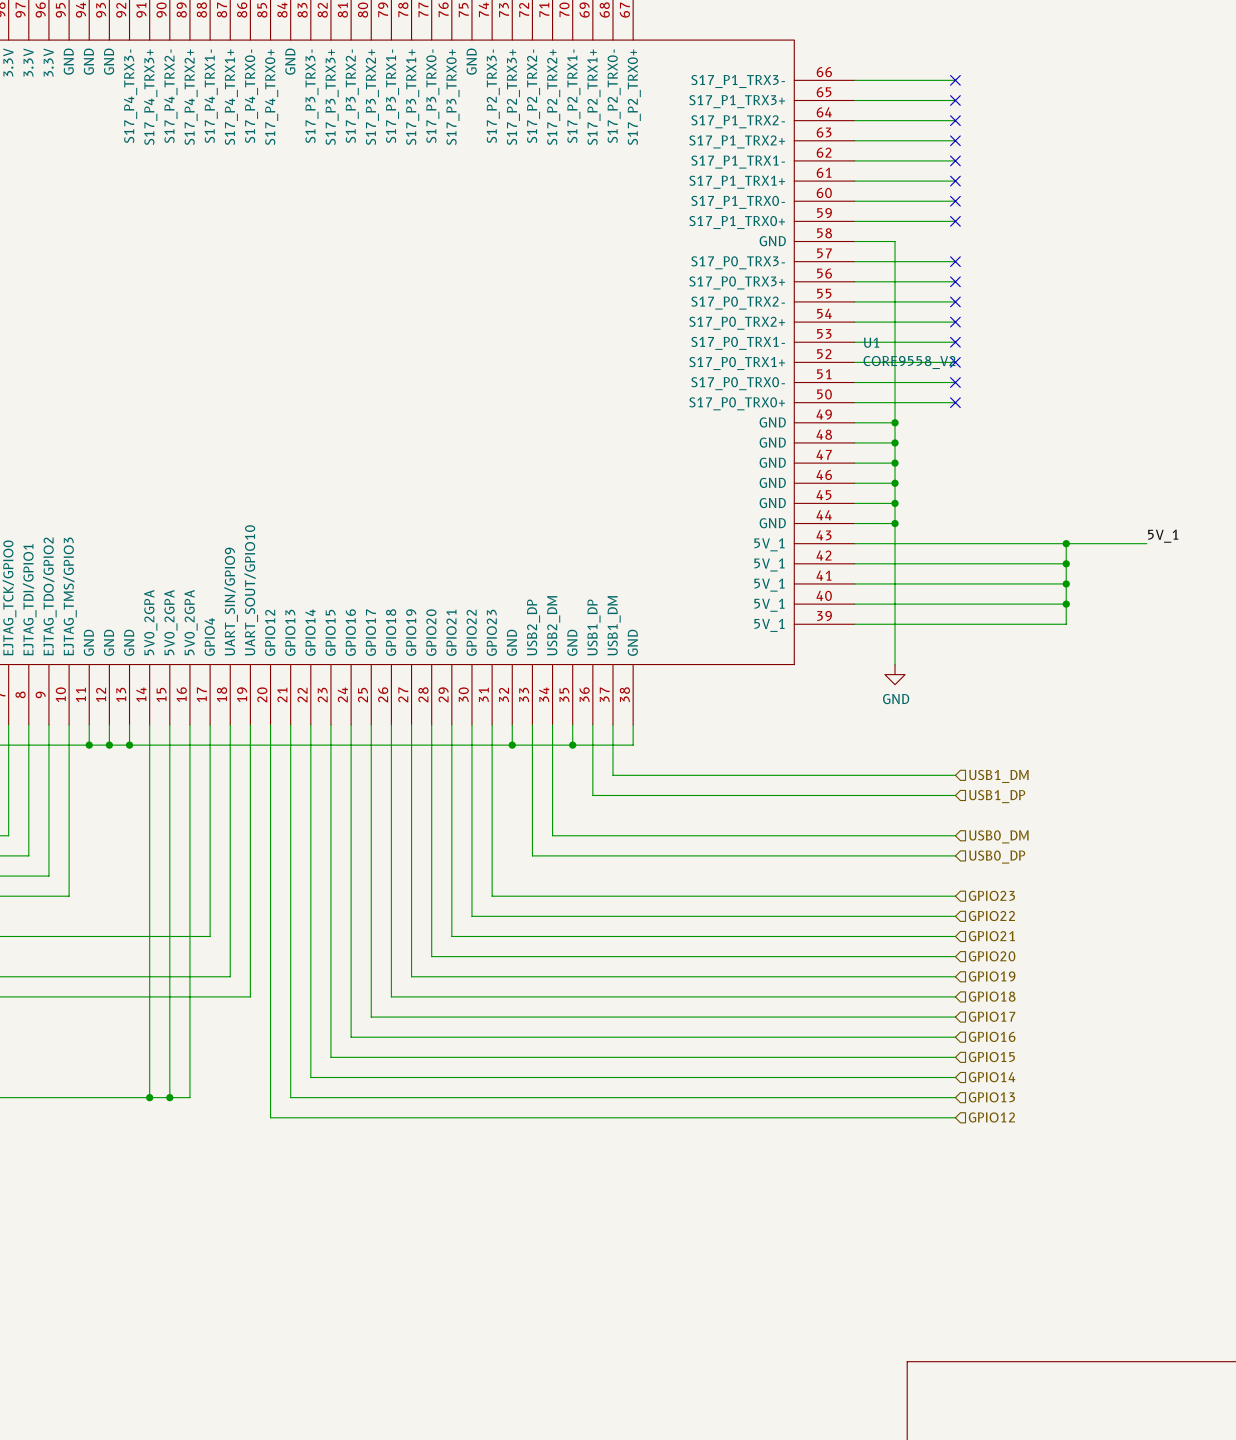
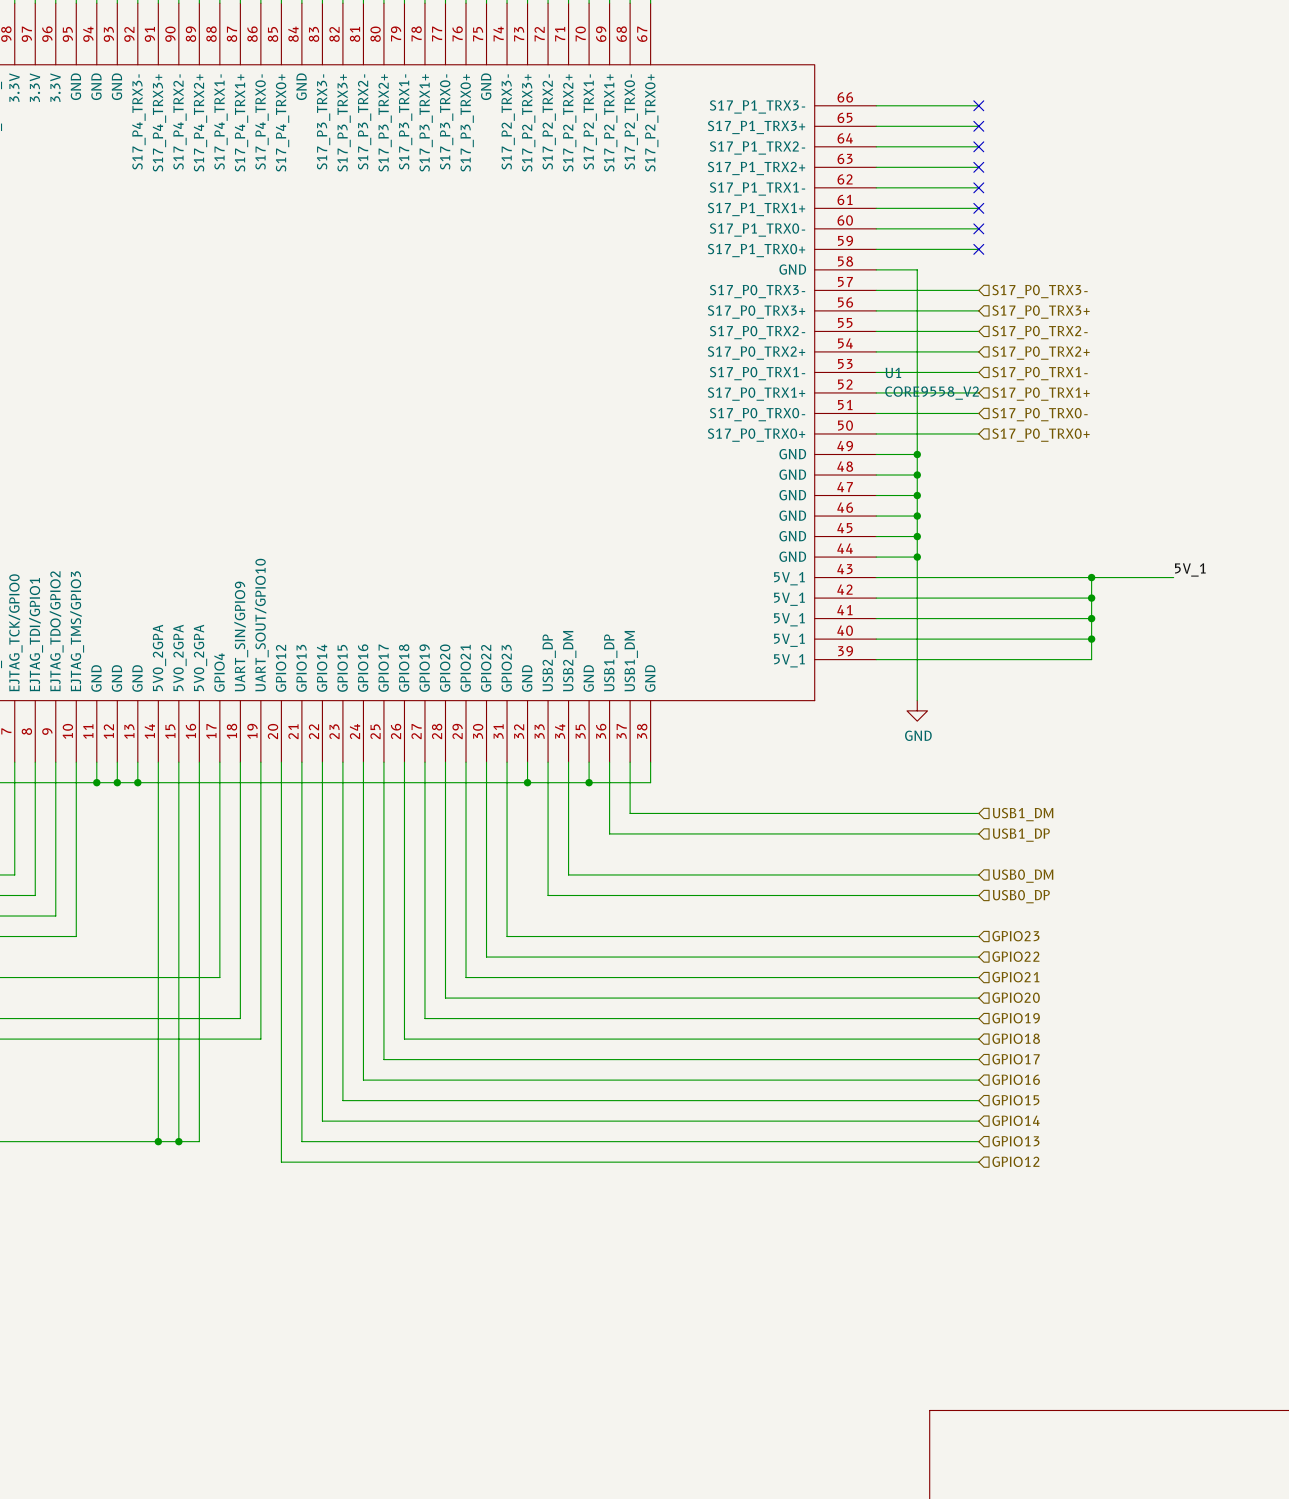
no-connect mark: (955, 261) -> none
hierarchical label: none -> S17_P0_TRX3- (1040, 291)
no-connect mark: (955, 281) -> none
hierarchical label: none -> S17_P0_TRX3+ (1041, 312)
no-connect mark: (955, 301) -> none
hierarchical label: none -> S17_P0_TRX2- (1040, 332)
no-connect mark: (955, 322) -> none
hierarchical label: none -> S17_P0_TRX2+ (1041, 353)
no-connect mark: (955, 342) -> none
hierarchical label: none -> S17_P0_TRX1- (1040, 373)
no-connect mark: (955, 362) -> none
hierarchical label: none -> S17_P0_TRX1+ (1041, 394)
no-connect mark: (955, 382) -> none
hierarchical label: none -> S17_P0_TRX0- (1040, 414)
no-connect mark: (955, 402) -> none
hierarchical label: none -> S17_P0_TRX0+ (1041, 435)

